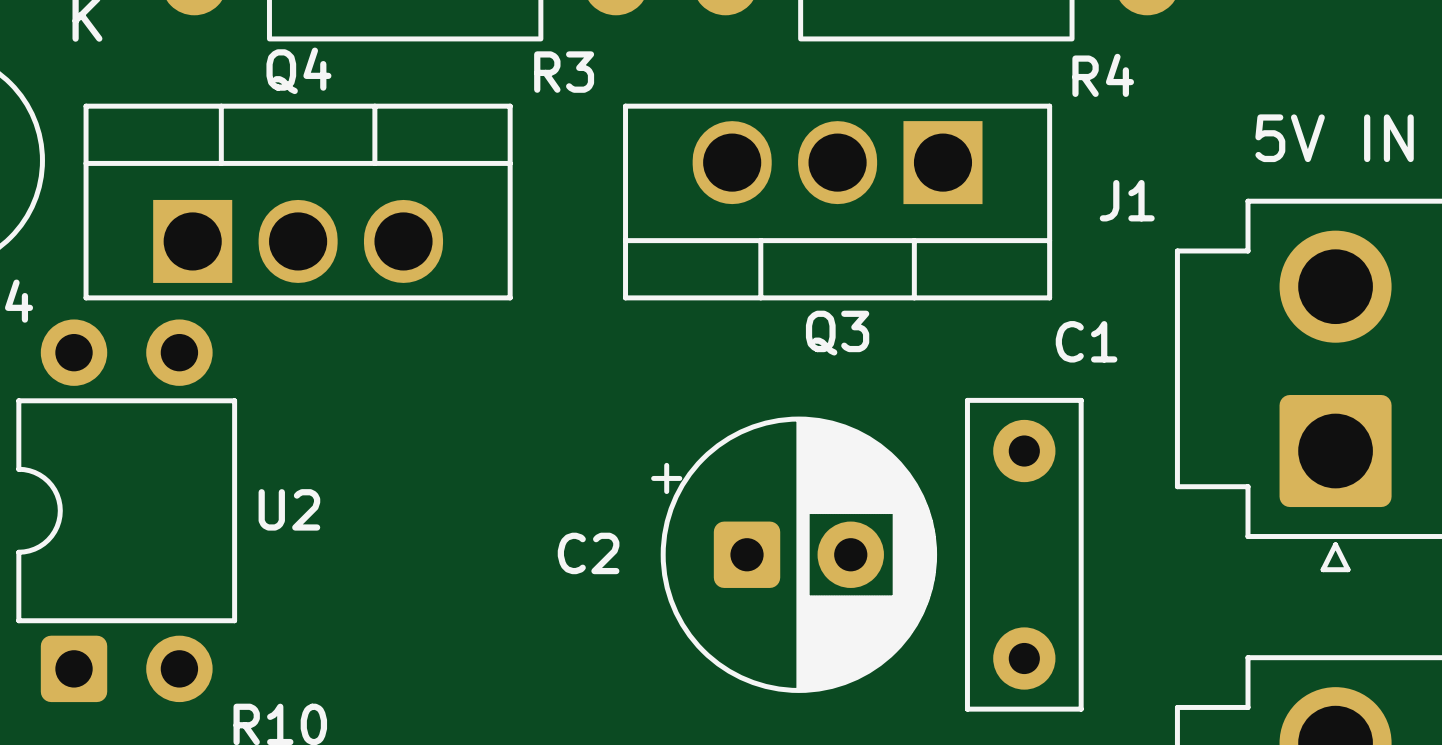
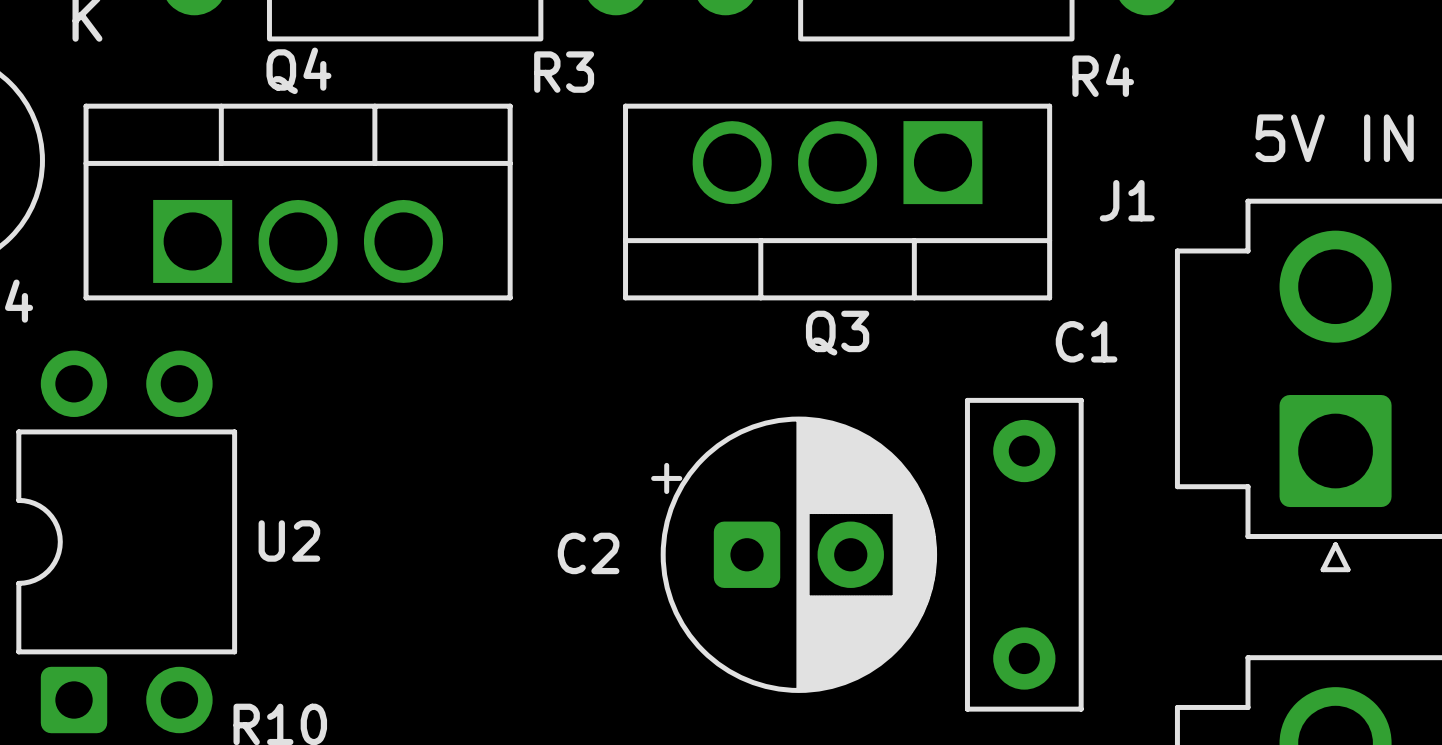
U2 position: (126, 510) -> (126, 541)

